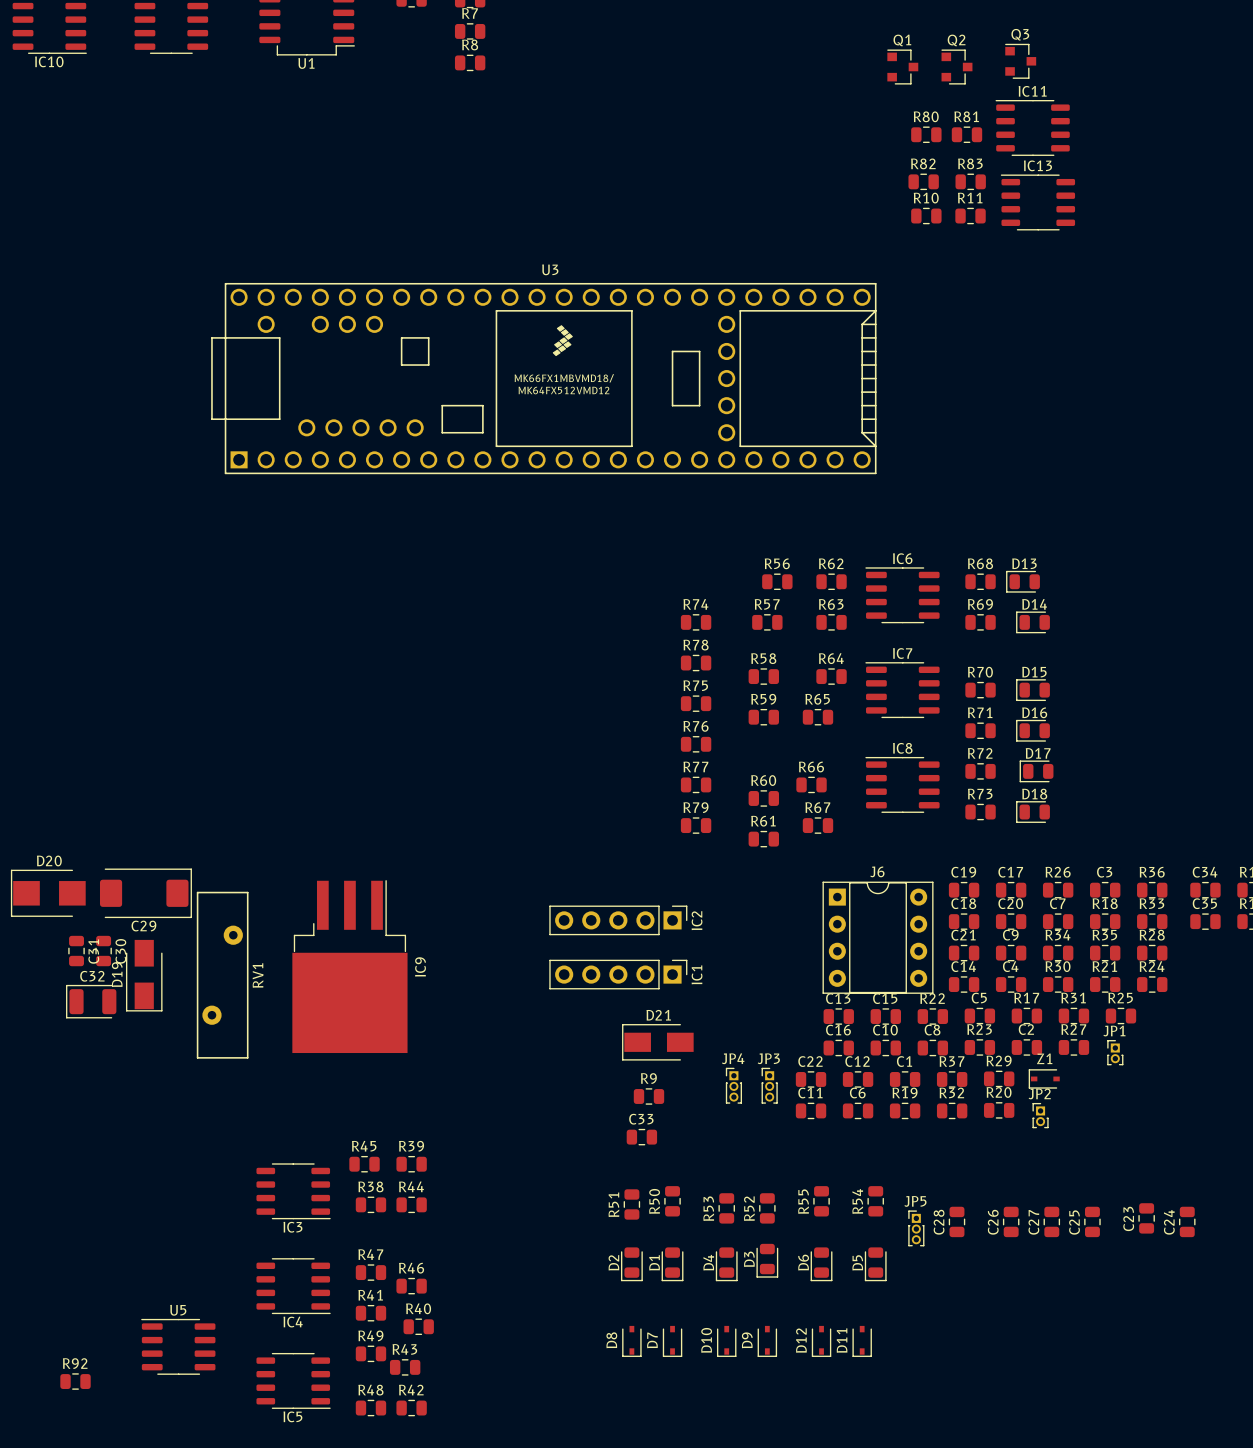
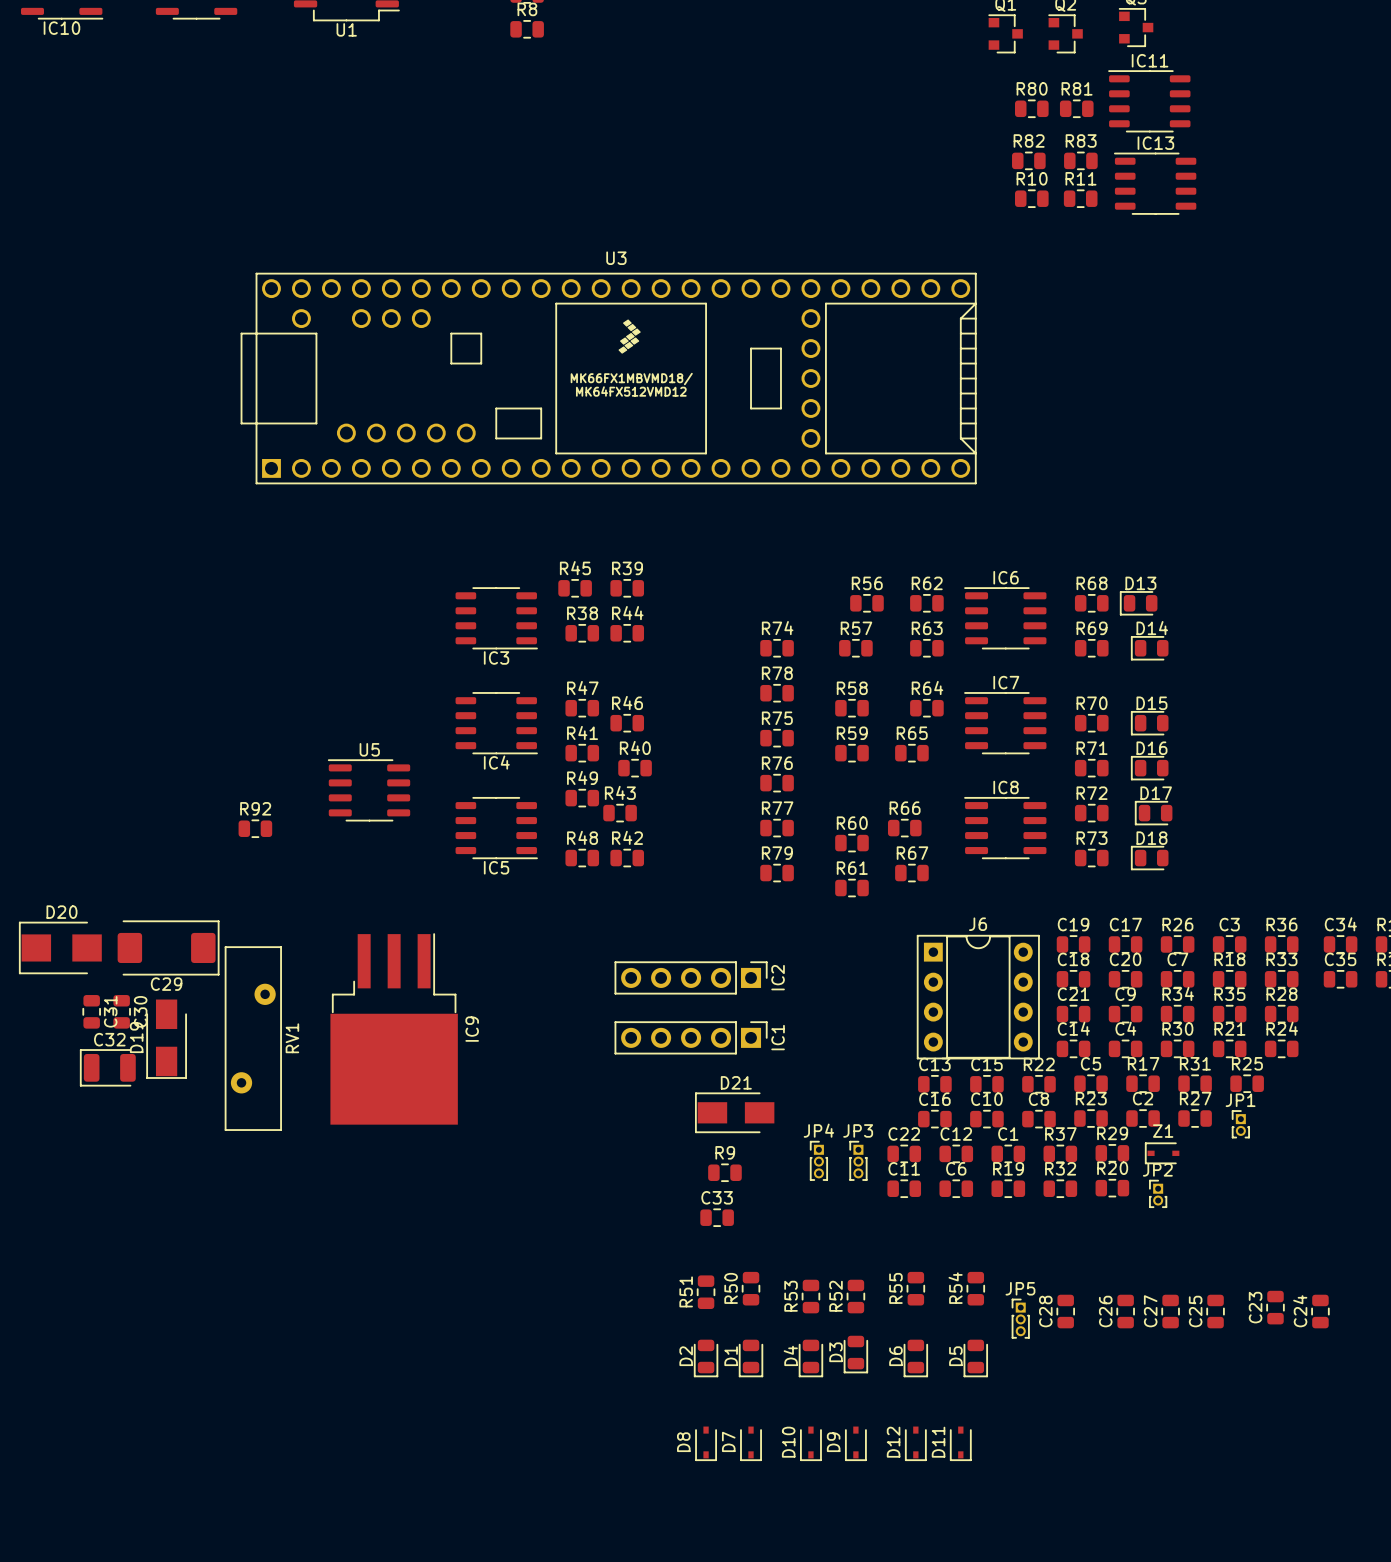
R45 position: (364, 1164) -> (575, 588)
R39 position: (411, 1164) -> (627, 588)
IC3 position: (293, 1191) -> (496, 618)
R38 position: (370, 1204) -> (582, 633)
R44 position: (411, 1204) -> (627, 633)
R47 position: (370, 1272) -> (582, 708)
IC4 position: (293, 1286) -> (496, 723)
R46 position: (411, 1286) -> (627, 723)
R41 position: (370, 1313) -> (582, 753)
R40 position: (418, 1326) -> (635, 768)
U5 position: (178, 1346) -> (369, 790)
R49 position: (370, 1353) -> (582, 798)
R43 position: (405, 1367) -> (620, 813)
IC5 position: (293, 1380) -> (496, 828)
R92 position: (75, 1381) -> (255, 828)
R48 position: (370, 1408) -> (582, 858)
R42 position: (411, 1408) -> (627, 858)

